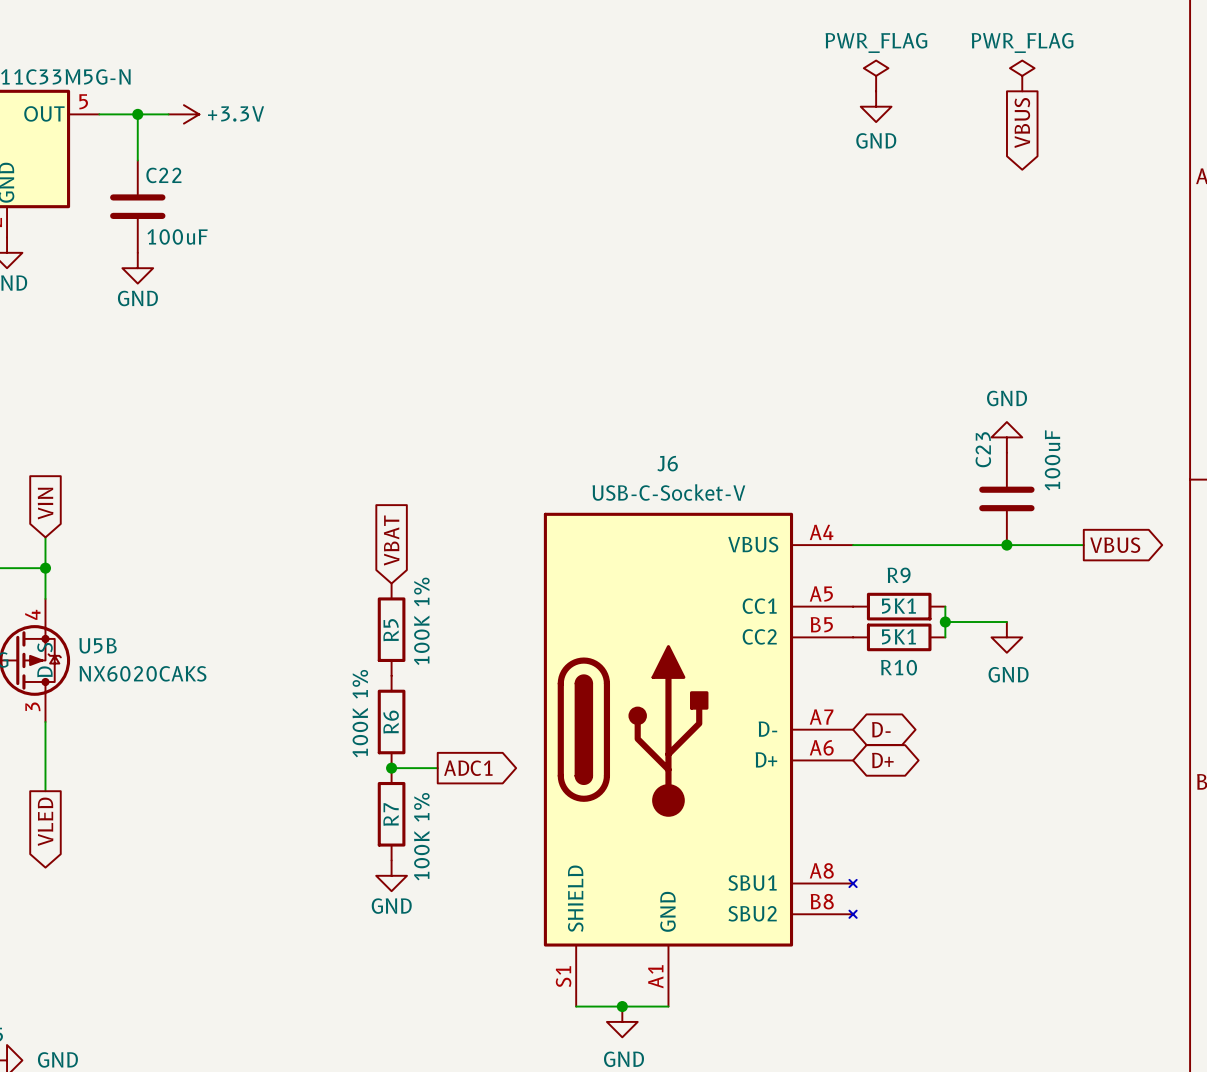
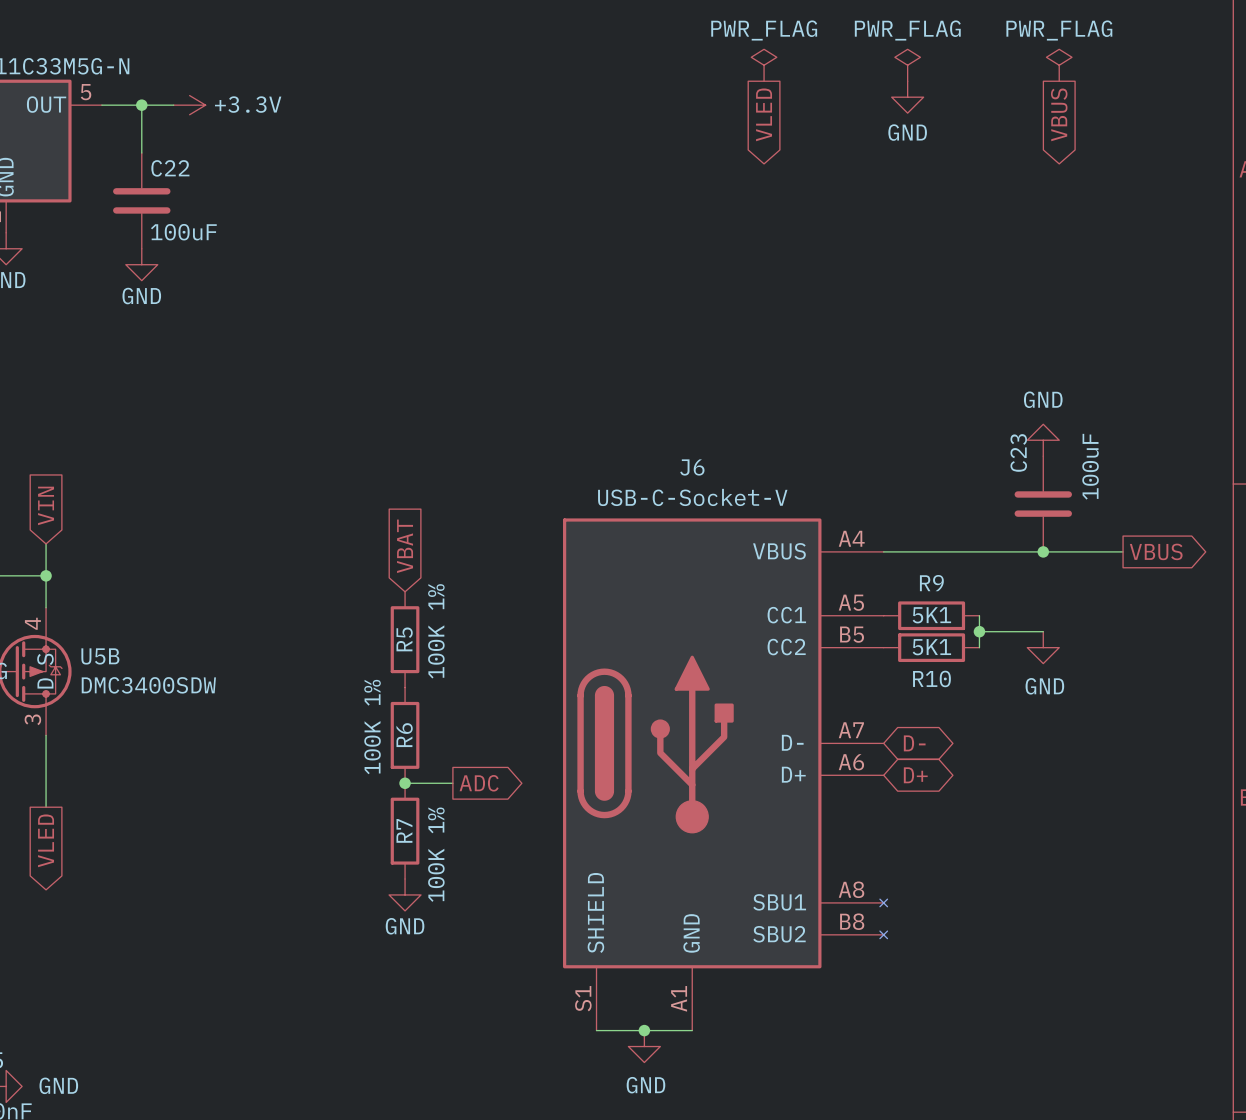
power symbol: none -> PWR_FLAG (764, 65)
global label: none -> VLED (764, 114)
U5B value: NX6020CAKS (142, 673) -> DMC3400SDW (148, 685)
global label: ADC1 (468, 768) -> ADC (479, 783)

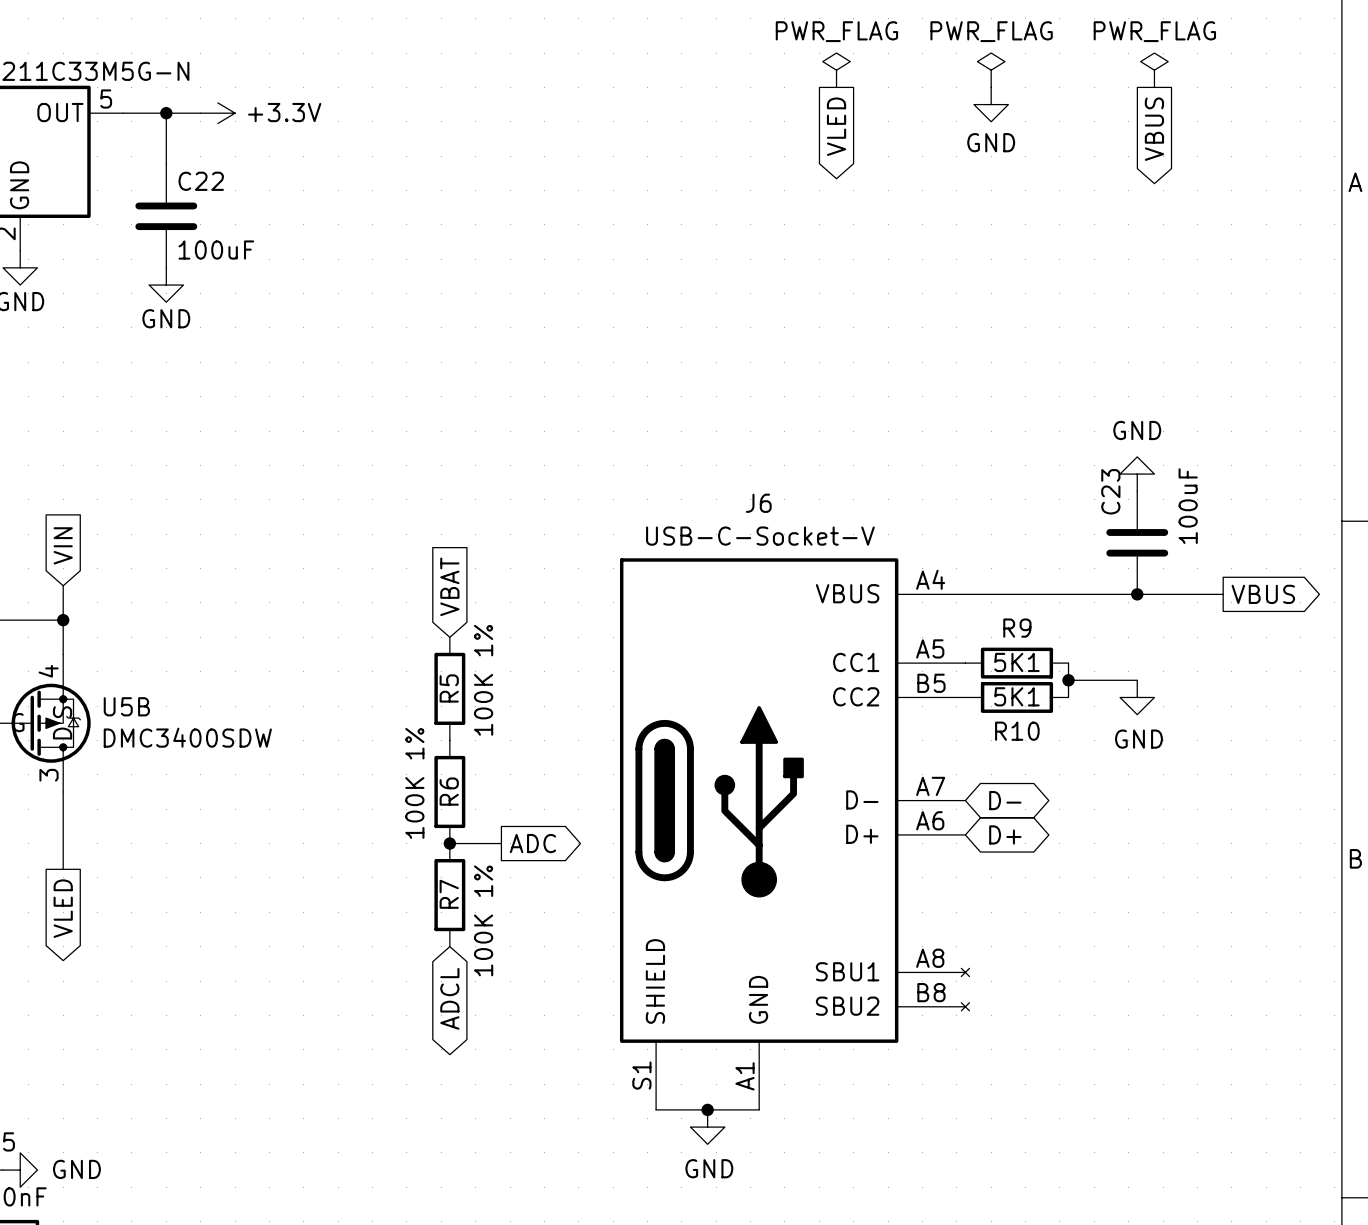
power symbol: GND (405, 894) -> none
global label: none -> ADCL (449, 998)

